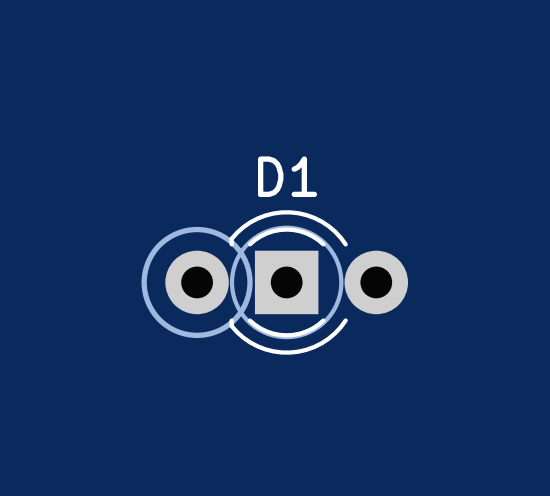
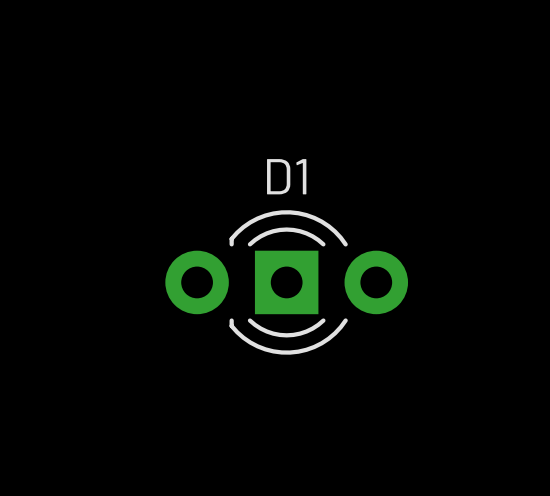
D1 footprint: [141, 210, 409, 355] -> [165, 210, 409, 355]
drawing: [229, 225, 344, 340] -> none

